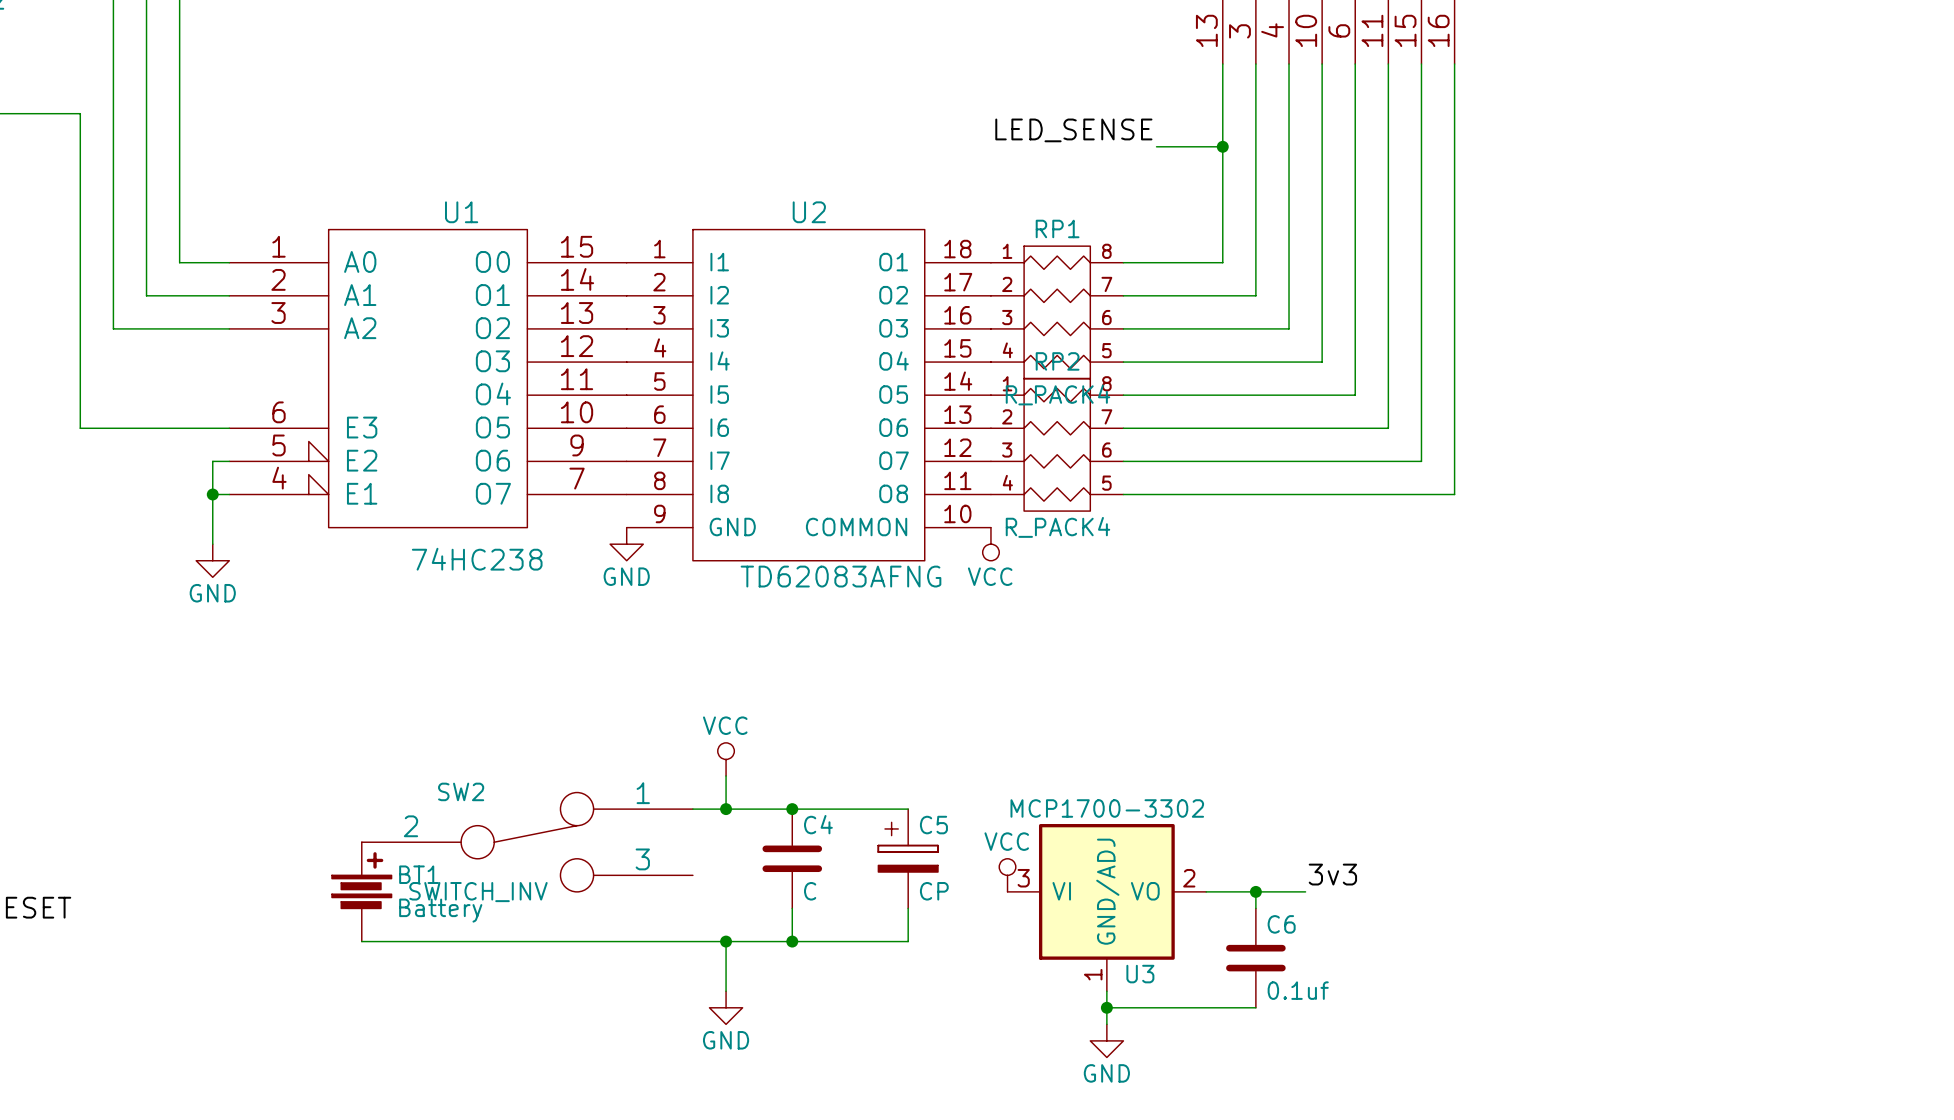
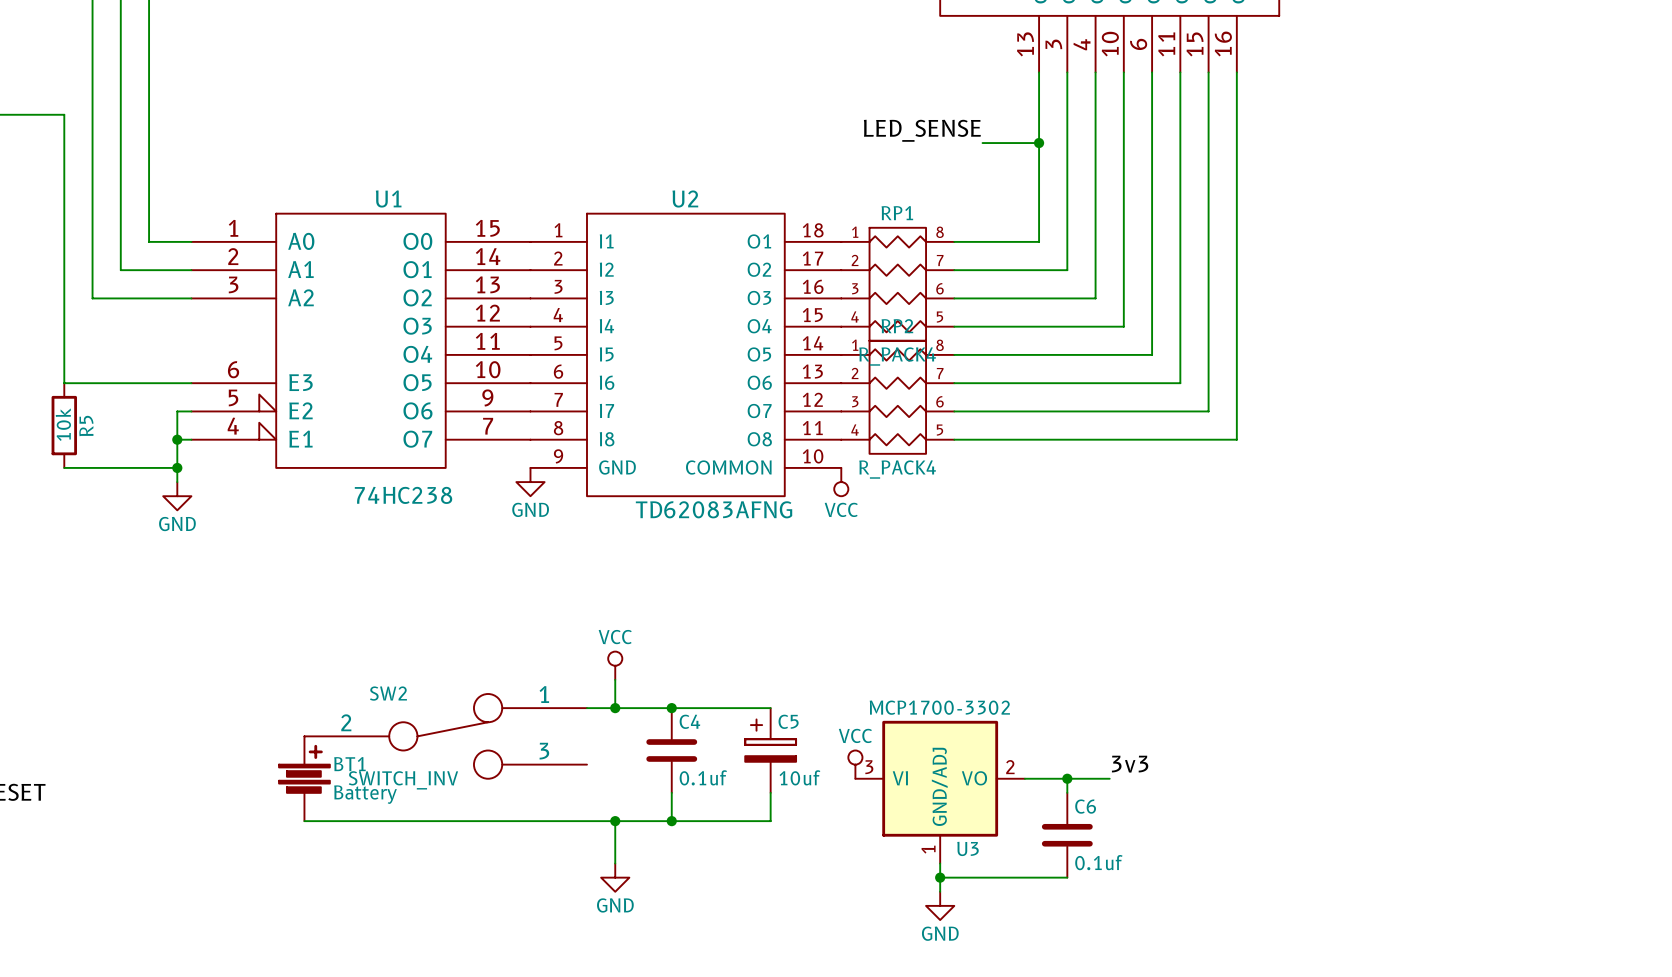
R5: none -> 10k (64, 425)
wire: none -> (64, 467) (177, 467)
junction: none -> (177, 467)
C4 value: C (810, 891) -> 0.1uf (703, 777)
C5 value: CP (934, 891) -> 10uf (799, 777)

